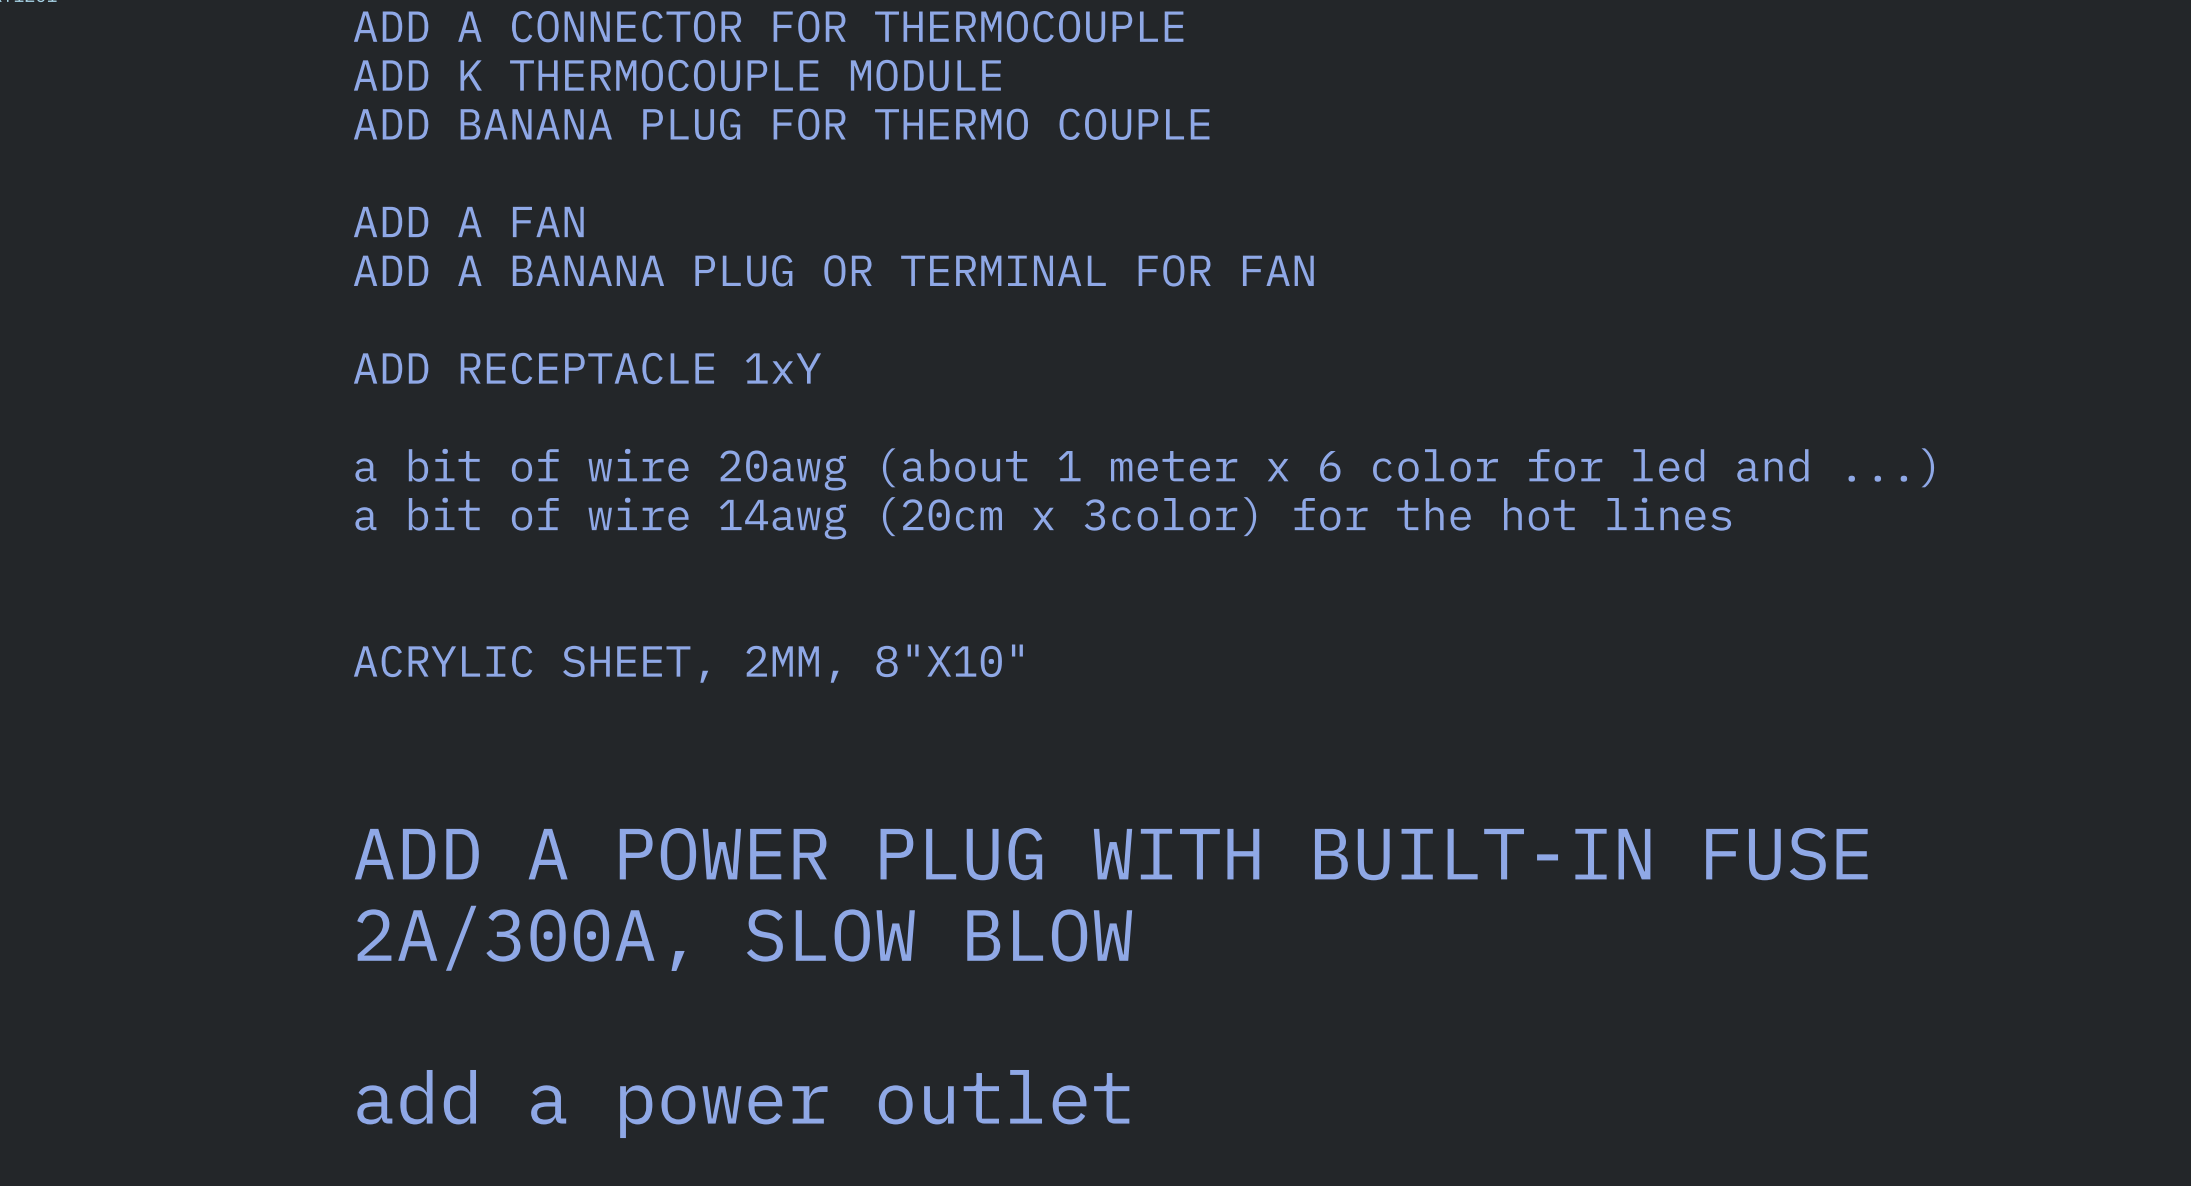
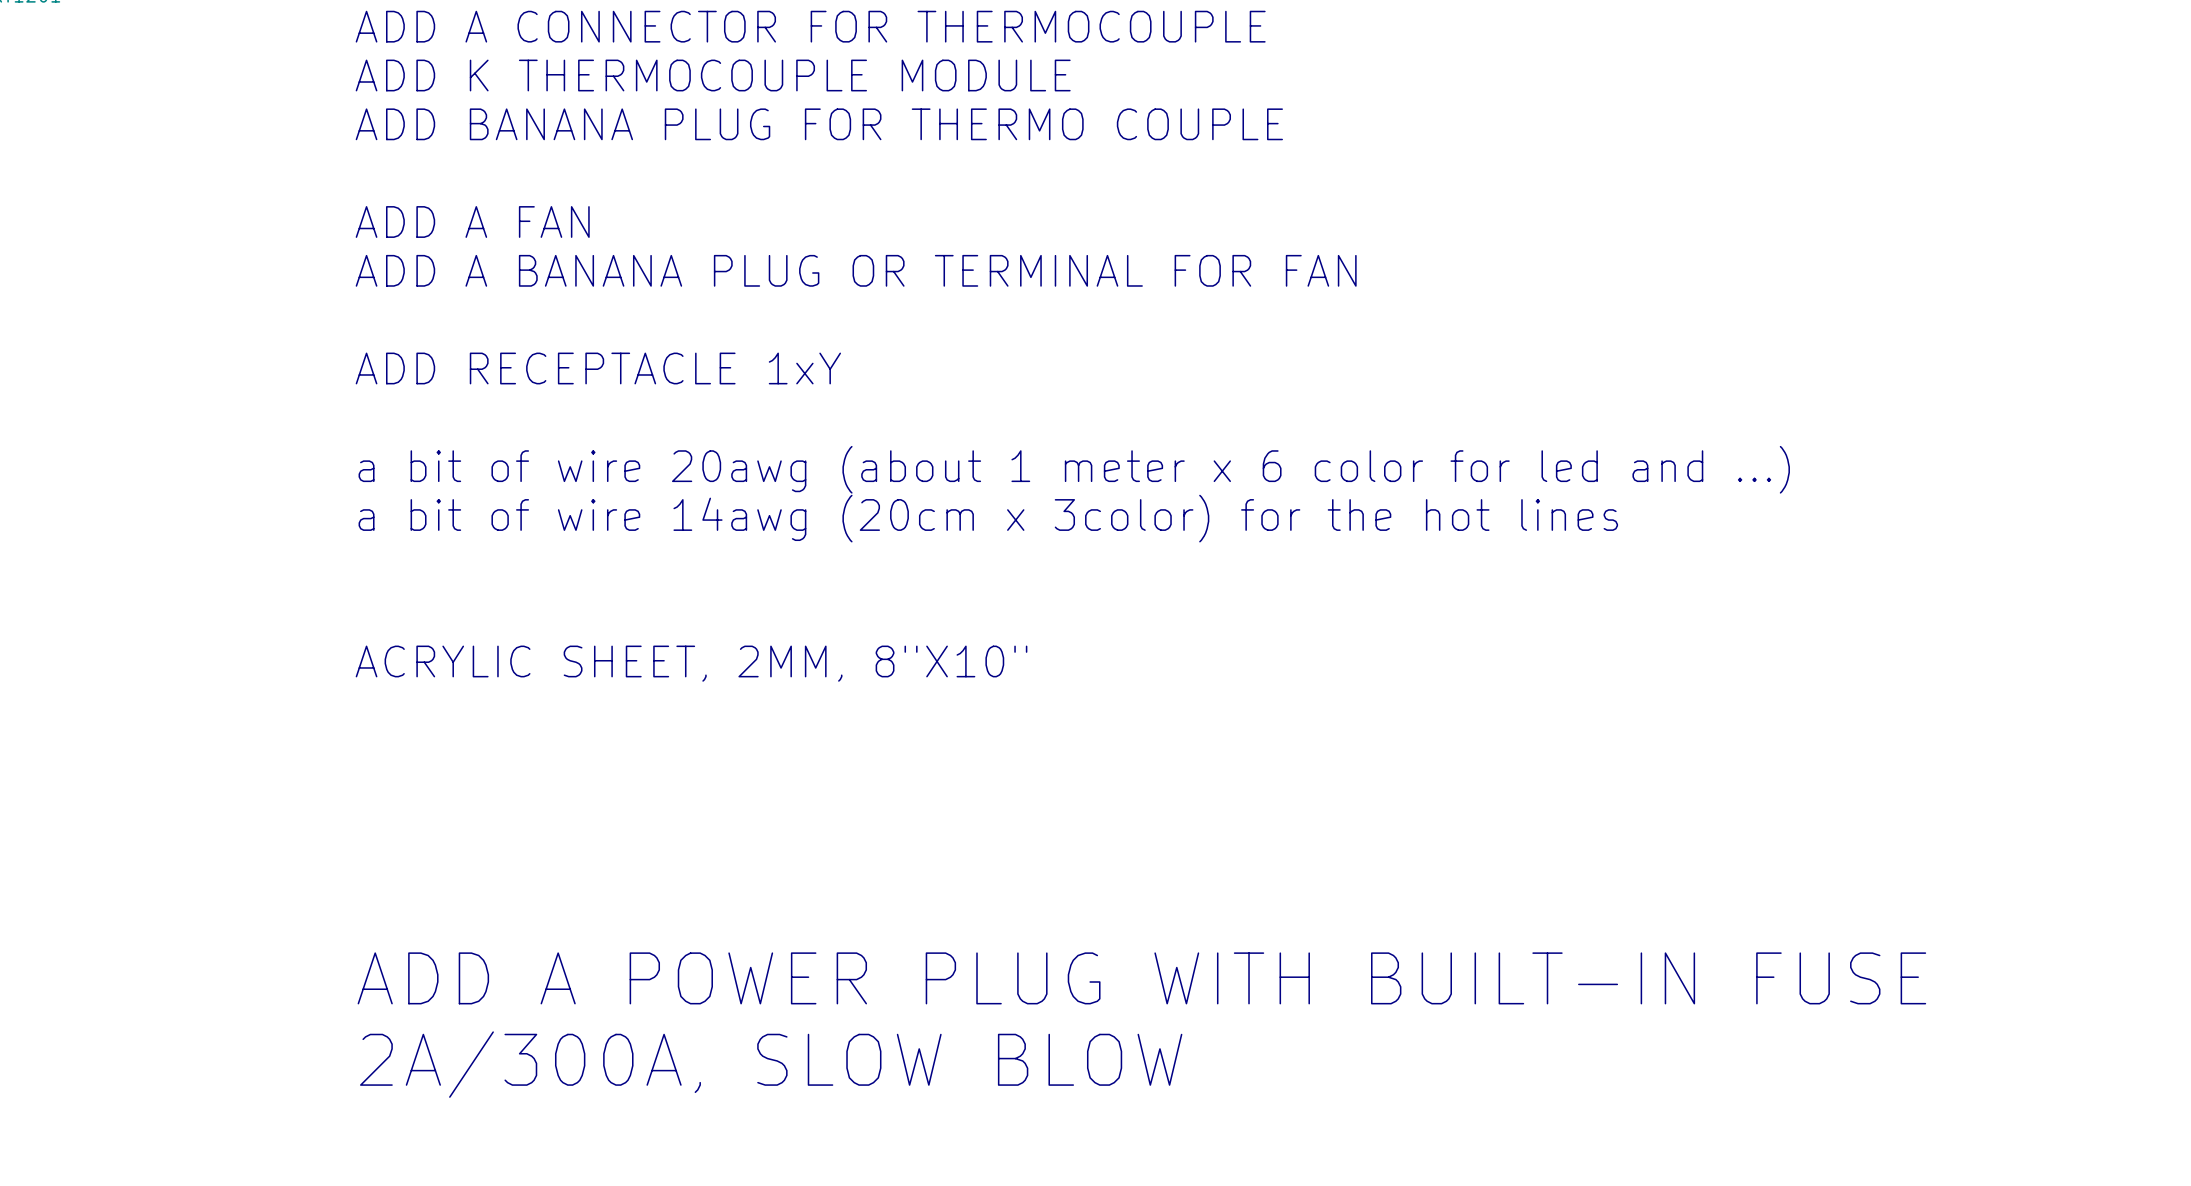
text position: ADD A POWER PLUG WITH BUILT-IN FUSE (1111, 854) -> ADD A POWER PLUG WITH BUILT-IN FUSE (1141, 978)
text position: 2A/300A, SLOW BLOW (744, 938) -> 2A/300A, SLOW BLOW (771, 1064)
text: add a power outlet (743, 1104) -> none

